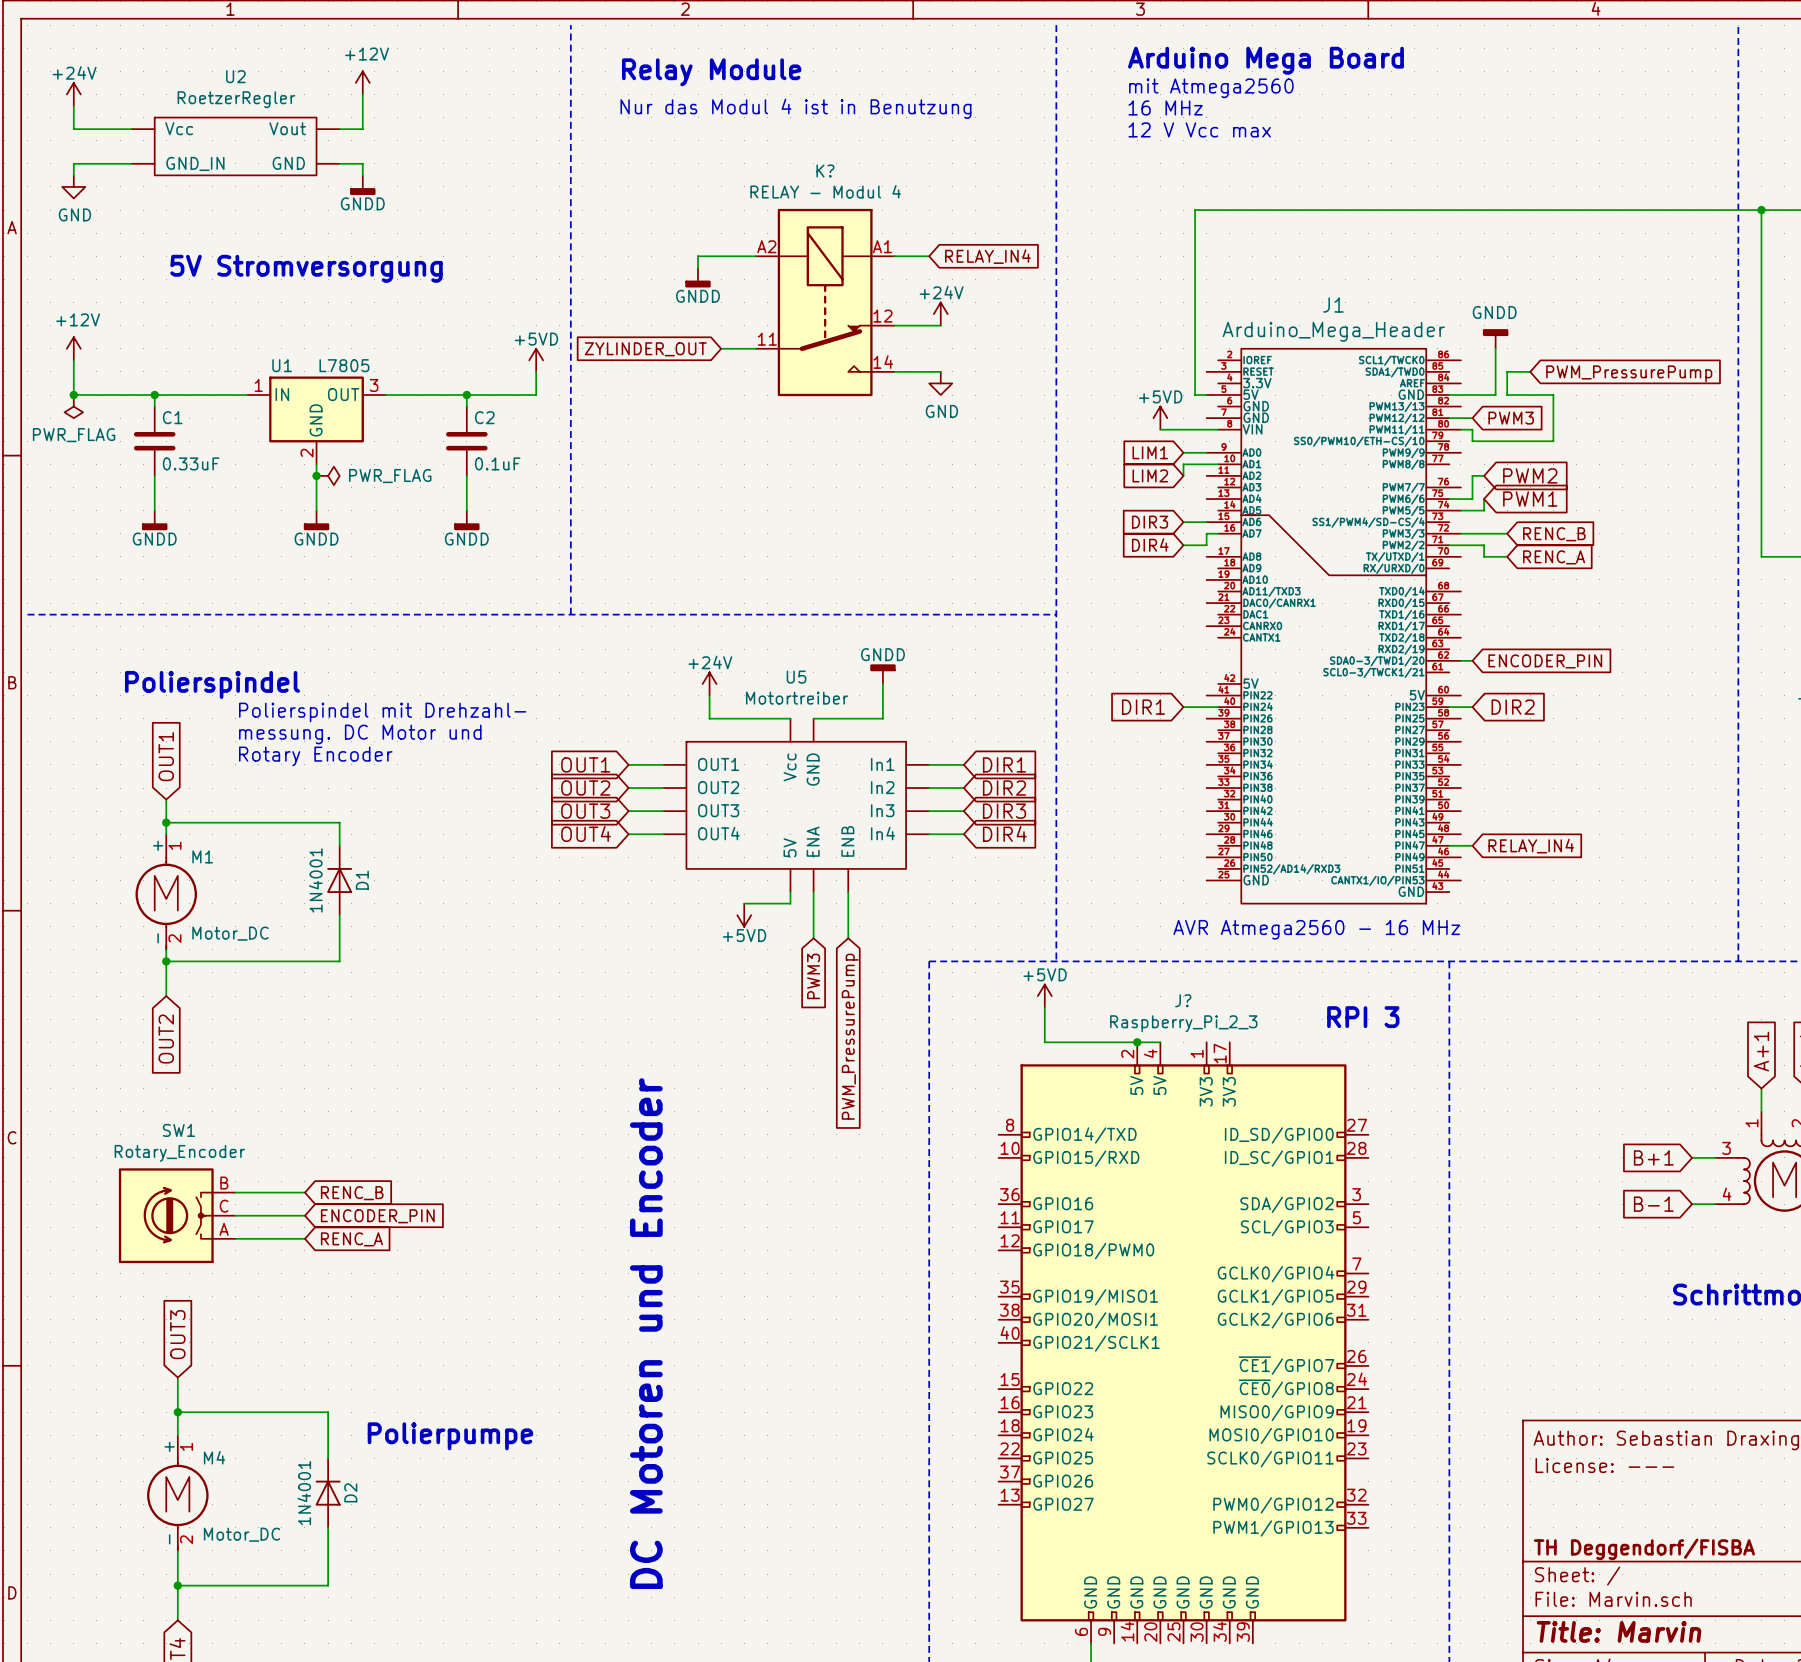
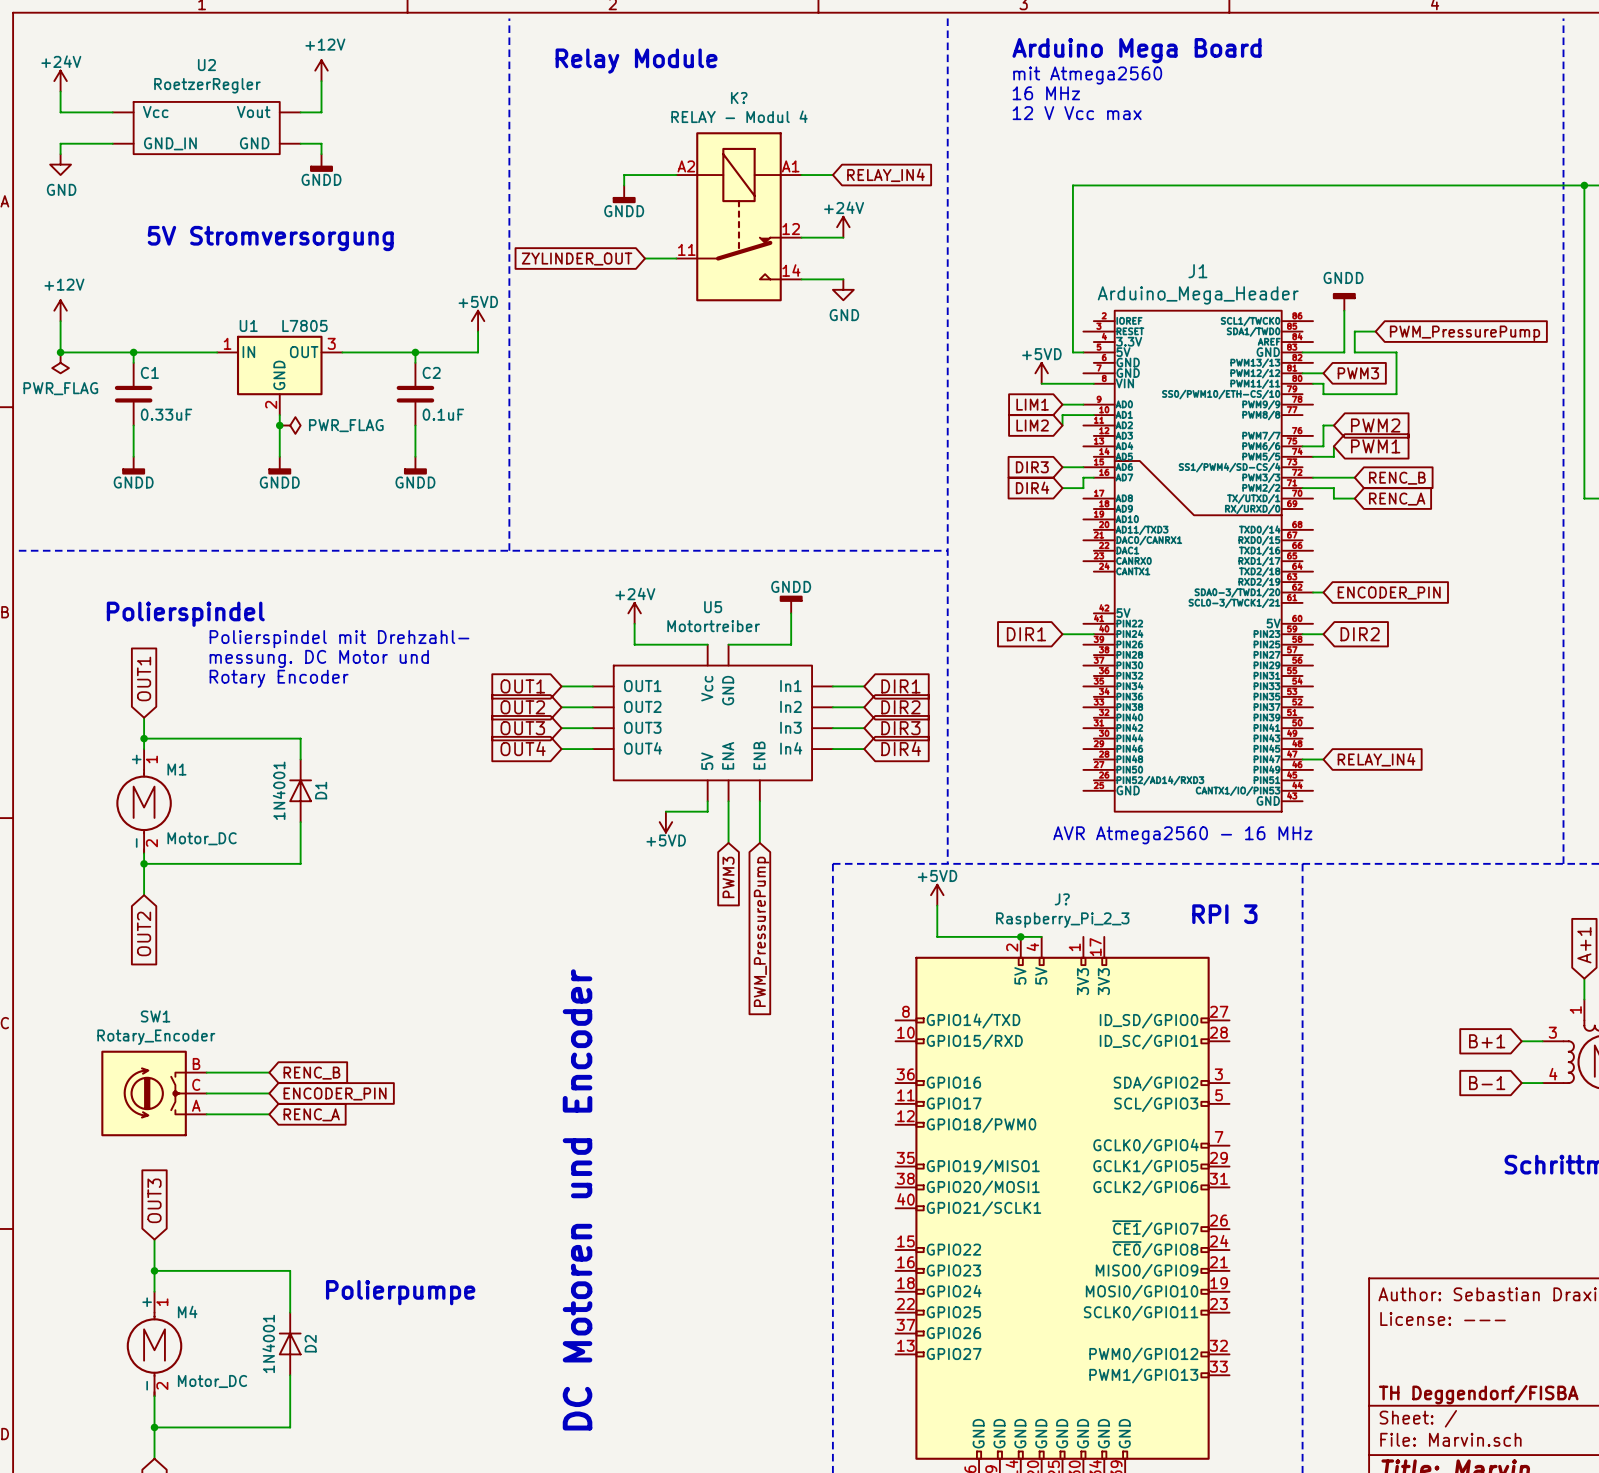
text: Nur das Modul 4 ist in Benutzung (795, 108) -> none
wire: (755, 256) (698, 256) (698, 267) -> (676, 175) (624, 175) (624, 185)
wire: (894, 256) (929, 256) -> (801, 175) (832, 175)
global label position: RELAY_IN4 (987, 256) -> RELAY_IN4 (885, 175)
power symbol position: GNDD (698, 277) -> GNDD (624, 194)
K? position: (825, 302) -> (738, 216)
power symbol position: +24V (940, 314) -> +24V (843, 227)
wire: (894, 325) (940, 325) -> (801, 237) (843, 237)
wire: (721, 348) (755, 348) -> (645, 258) (676, 258)
global label position: ZYLINDER_OUT (645, 349) -> ZYLINDER_OUT (577, 259)
wire: (894, 371) (940, 371) -> (801, 279) (843, 279)
power symbol position: GND (940, 383) -> GND (843, 289)

